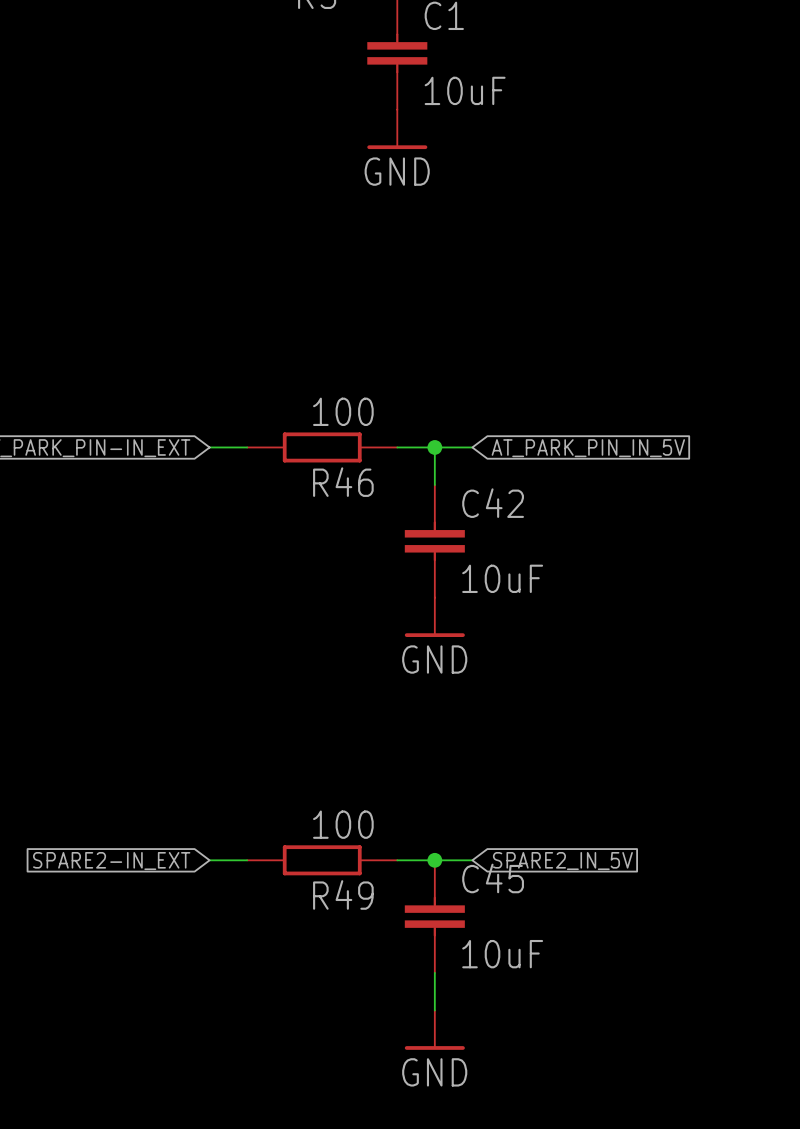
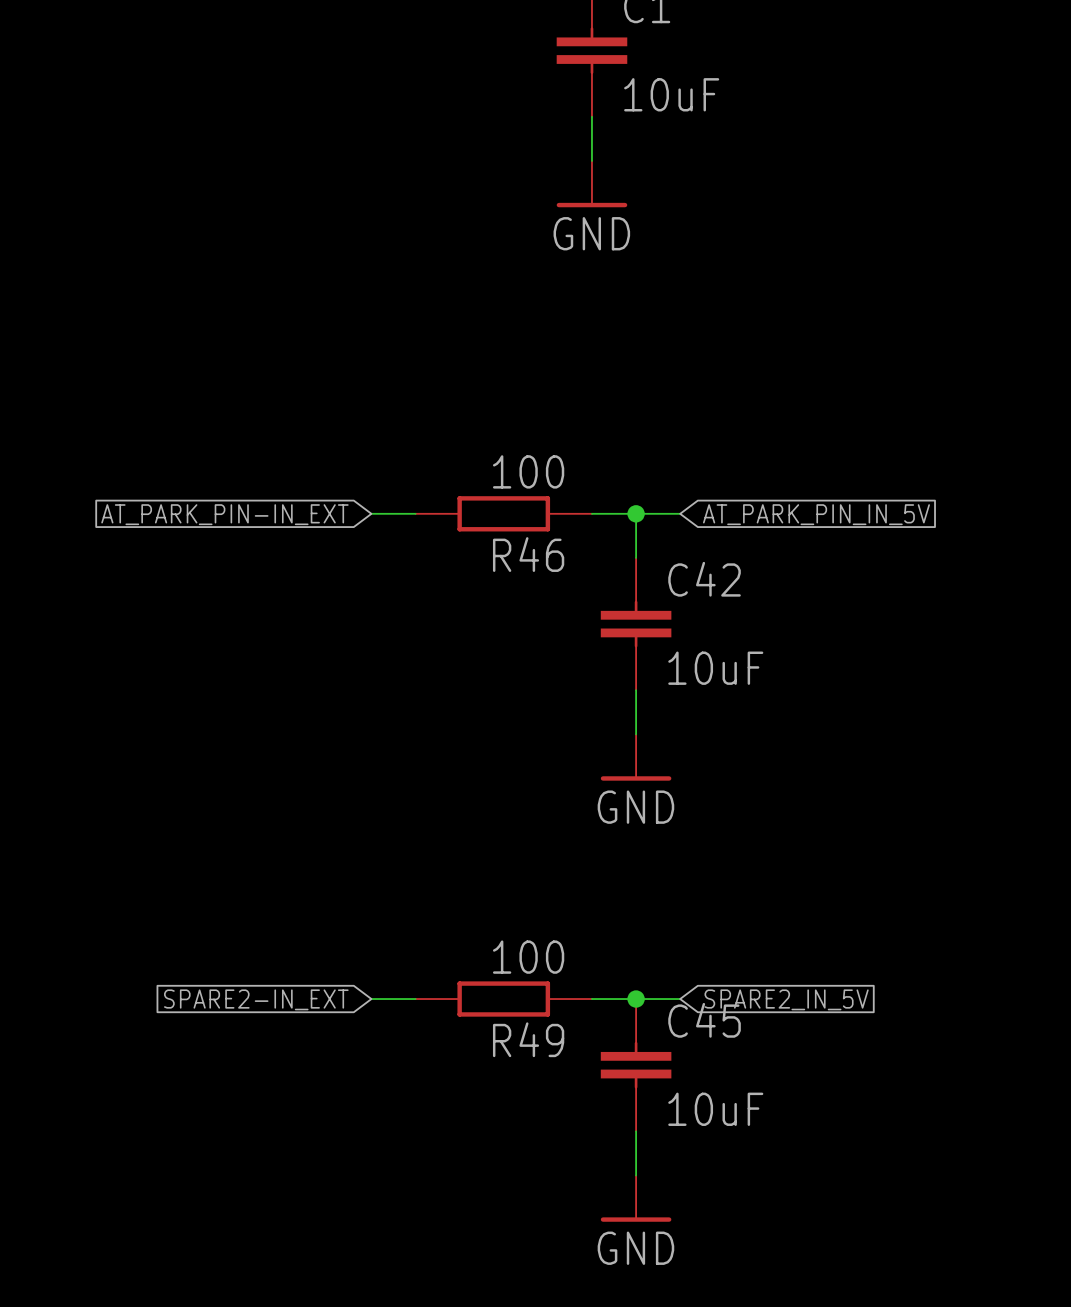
power symbol position: GND (397, 129) -> GND (591, 184)
power symbol position: GND (434, 617) -> GND (636, 757)

